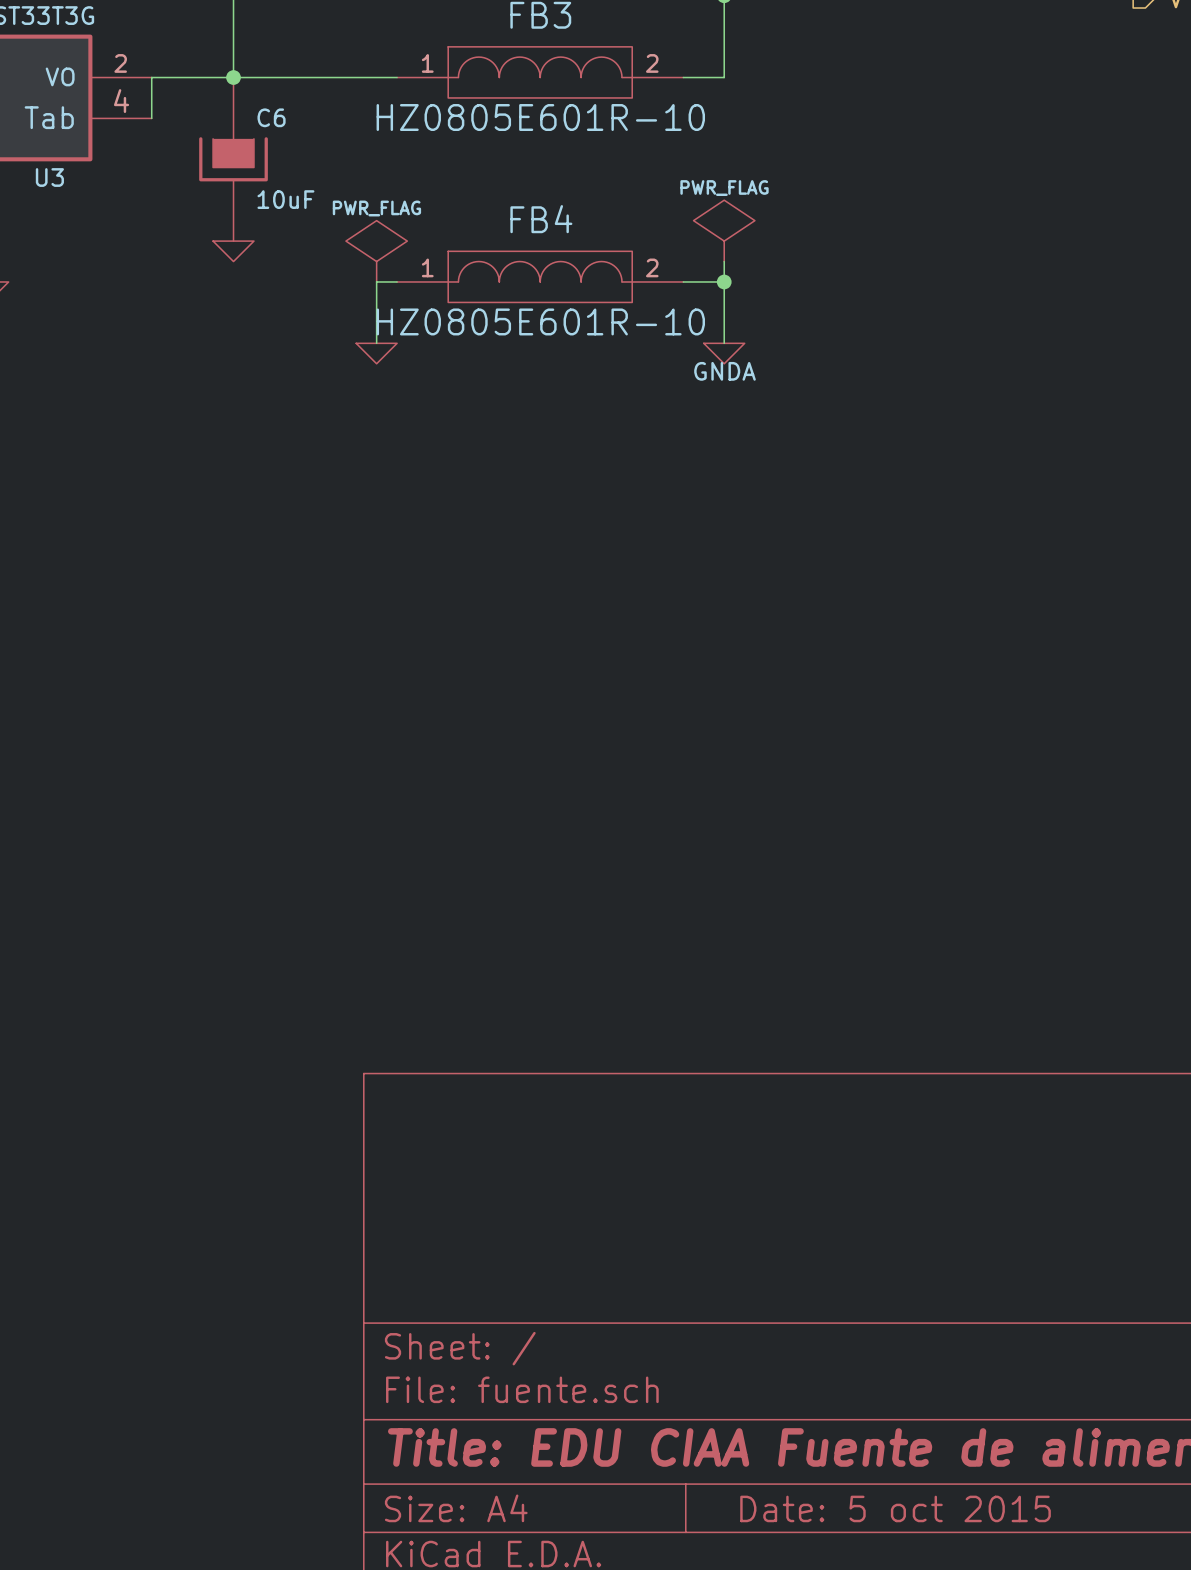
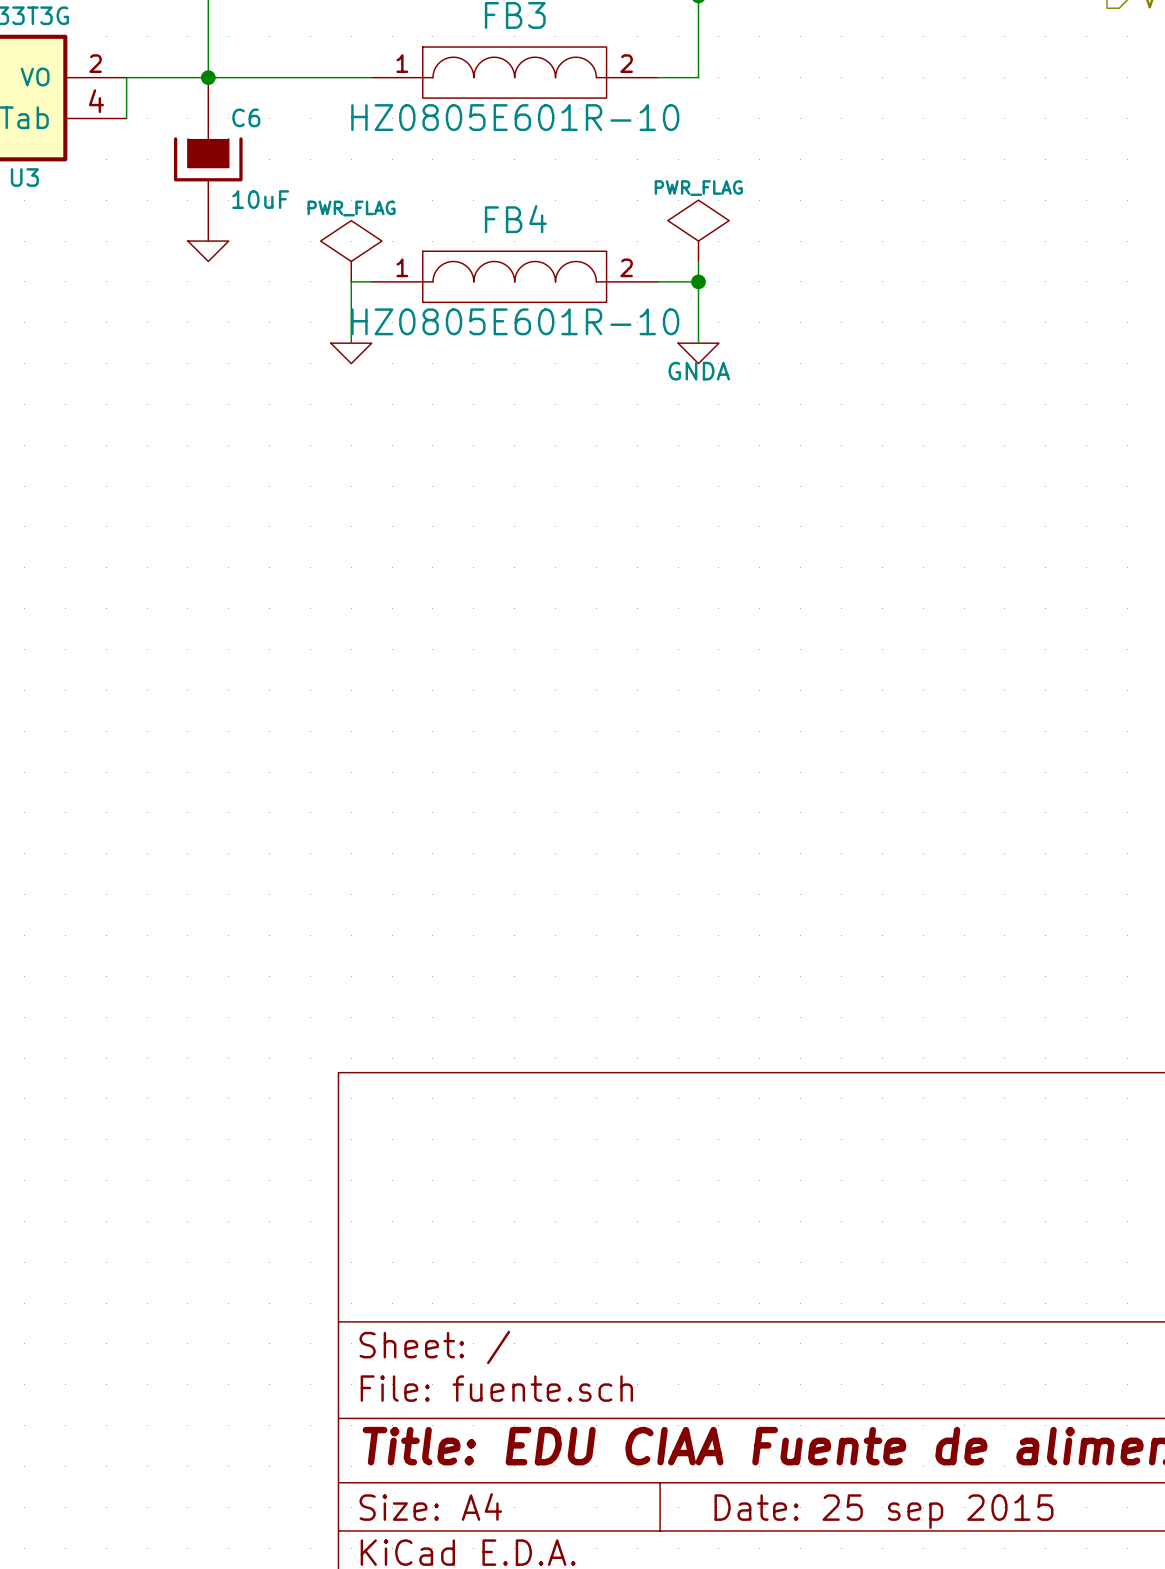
title block: Date: 5 oct 2015 (895, 1508) -> Date: 25 sep 2015 (884, 1511)

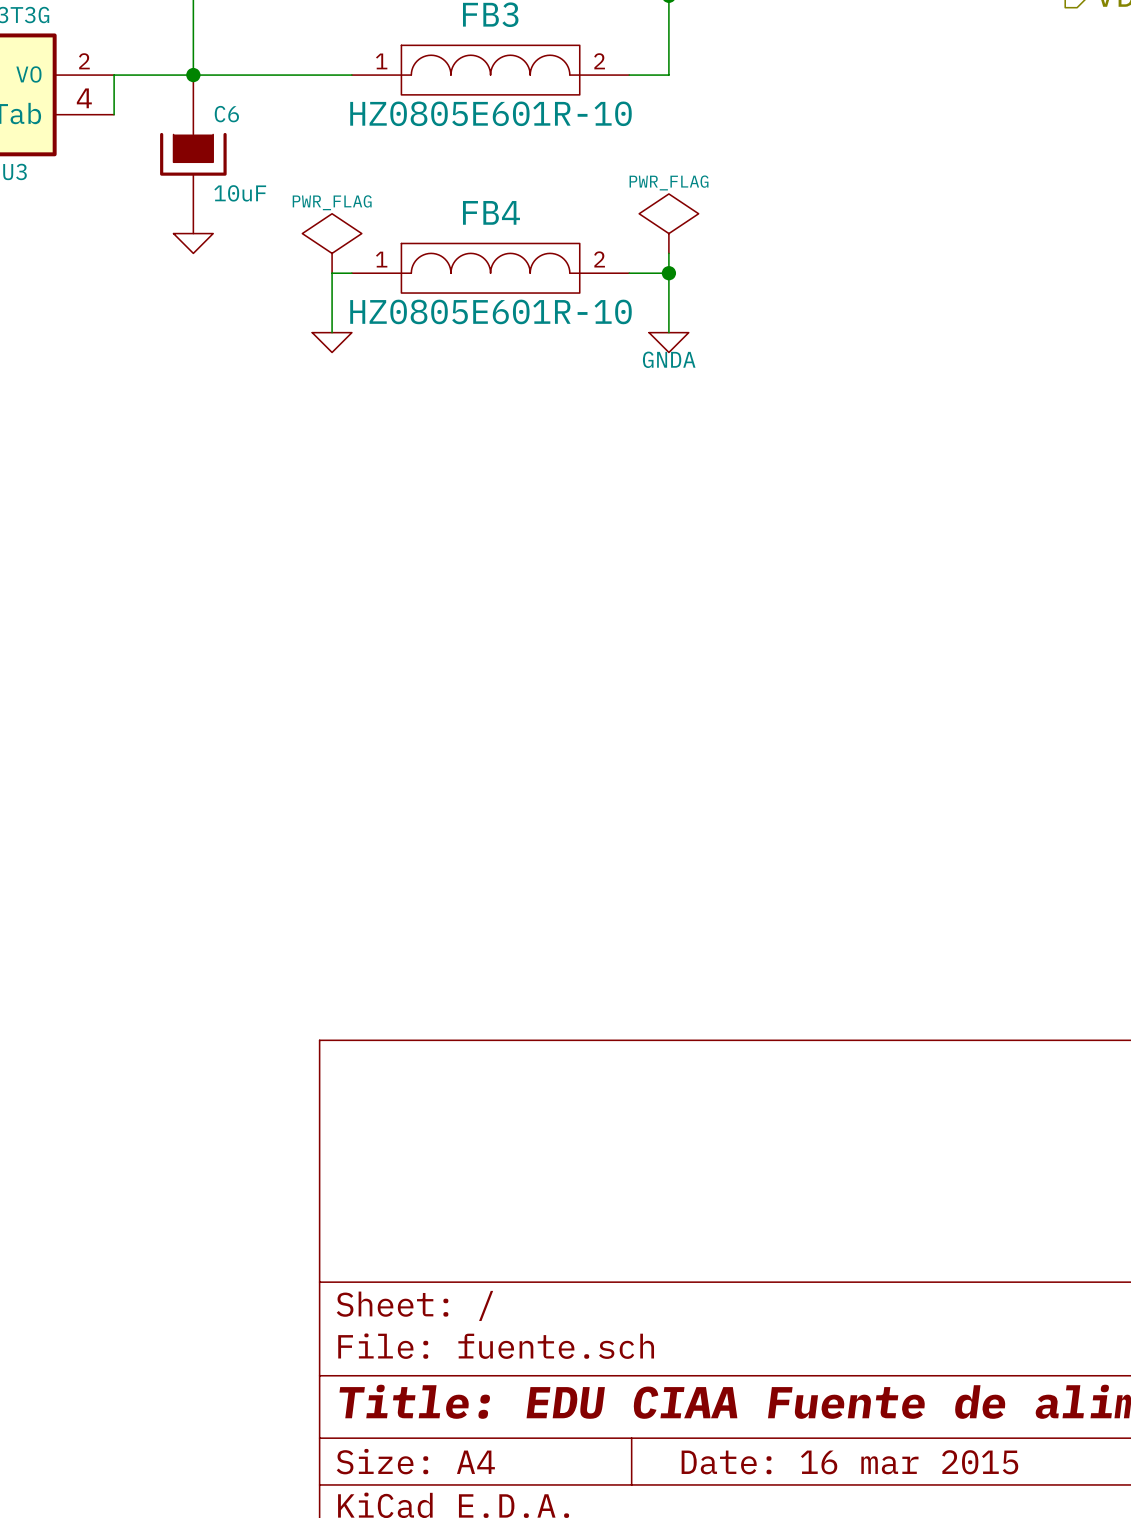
title block: Date: 25 sep 2015 (884, 1511) -> Date: 16 mar 2015 (849, 1462)

